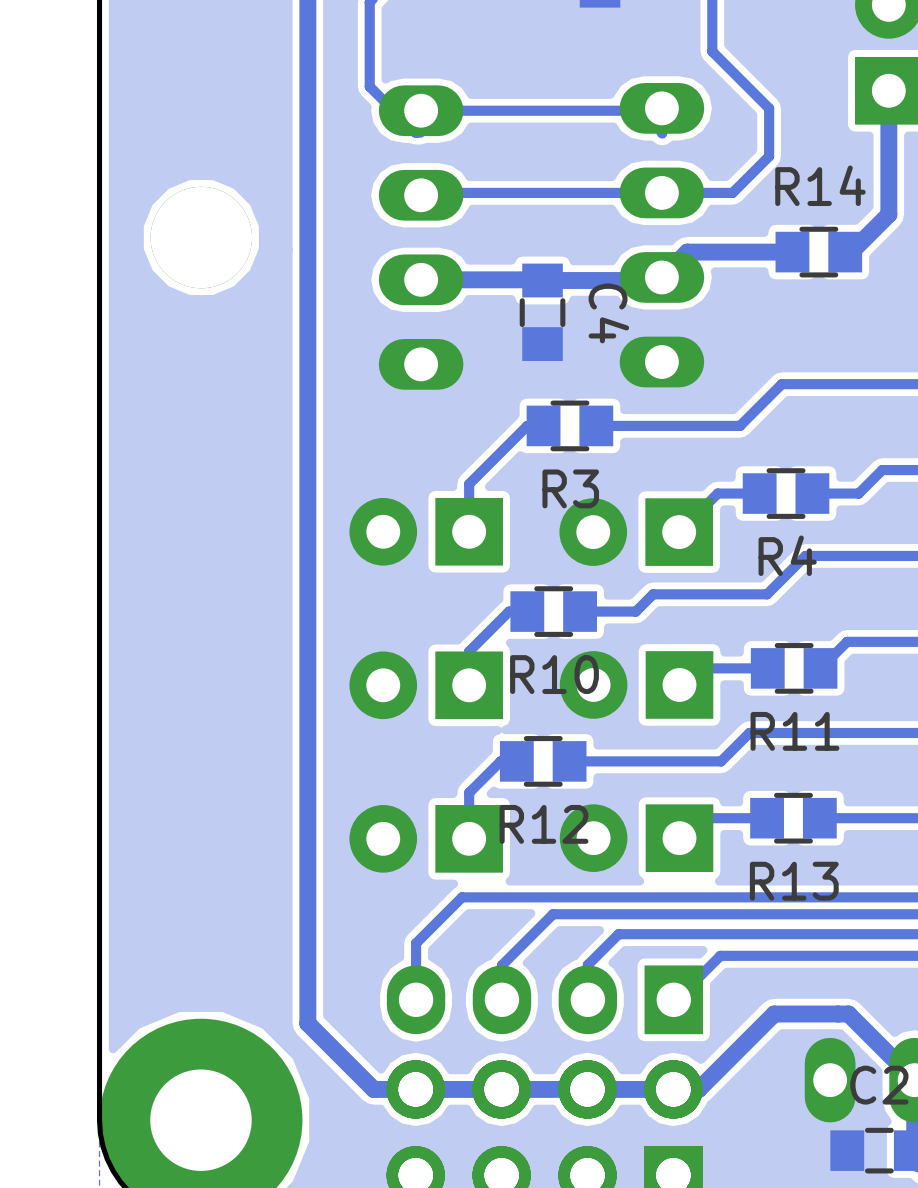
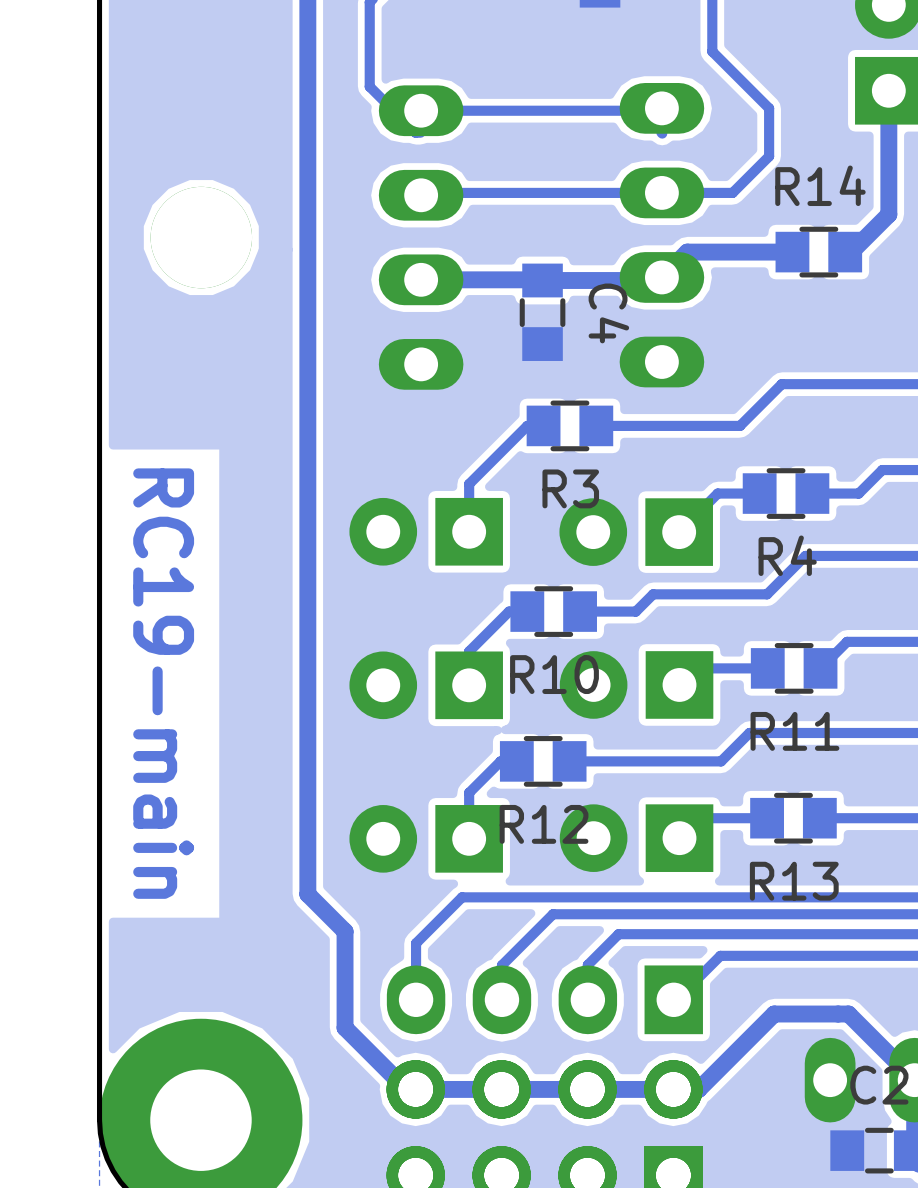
text: none -> RC19-main (163, 683)
track: (307, 894) (307, 1023) (373, 1089) (406, 1089) -> (307, 894) (345, 931) (345, 1027) (406, 1089)

